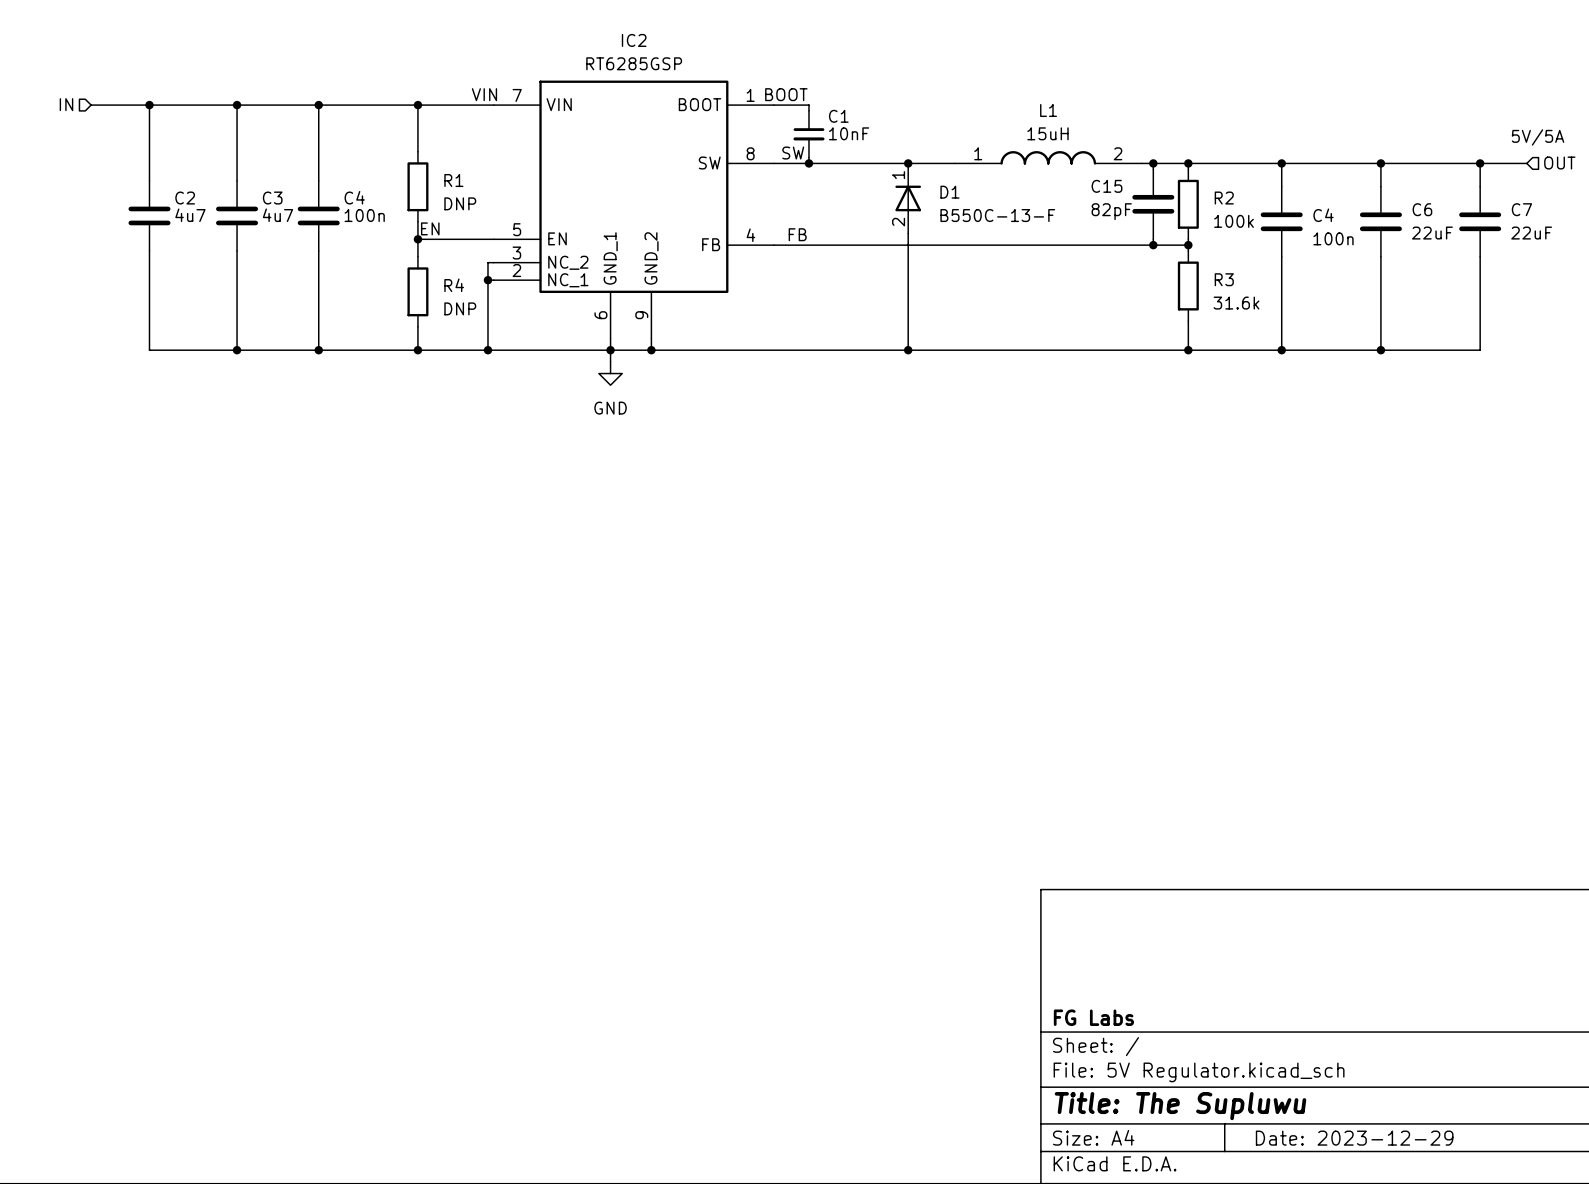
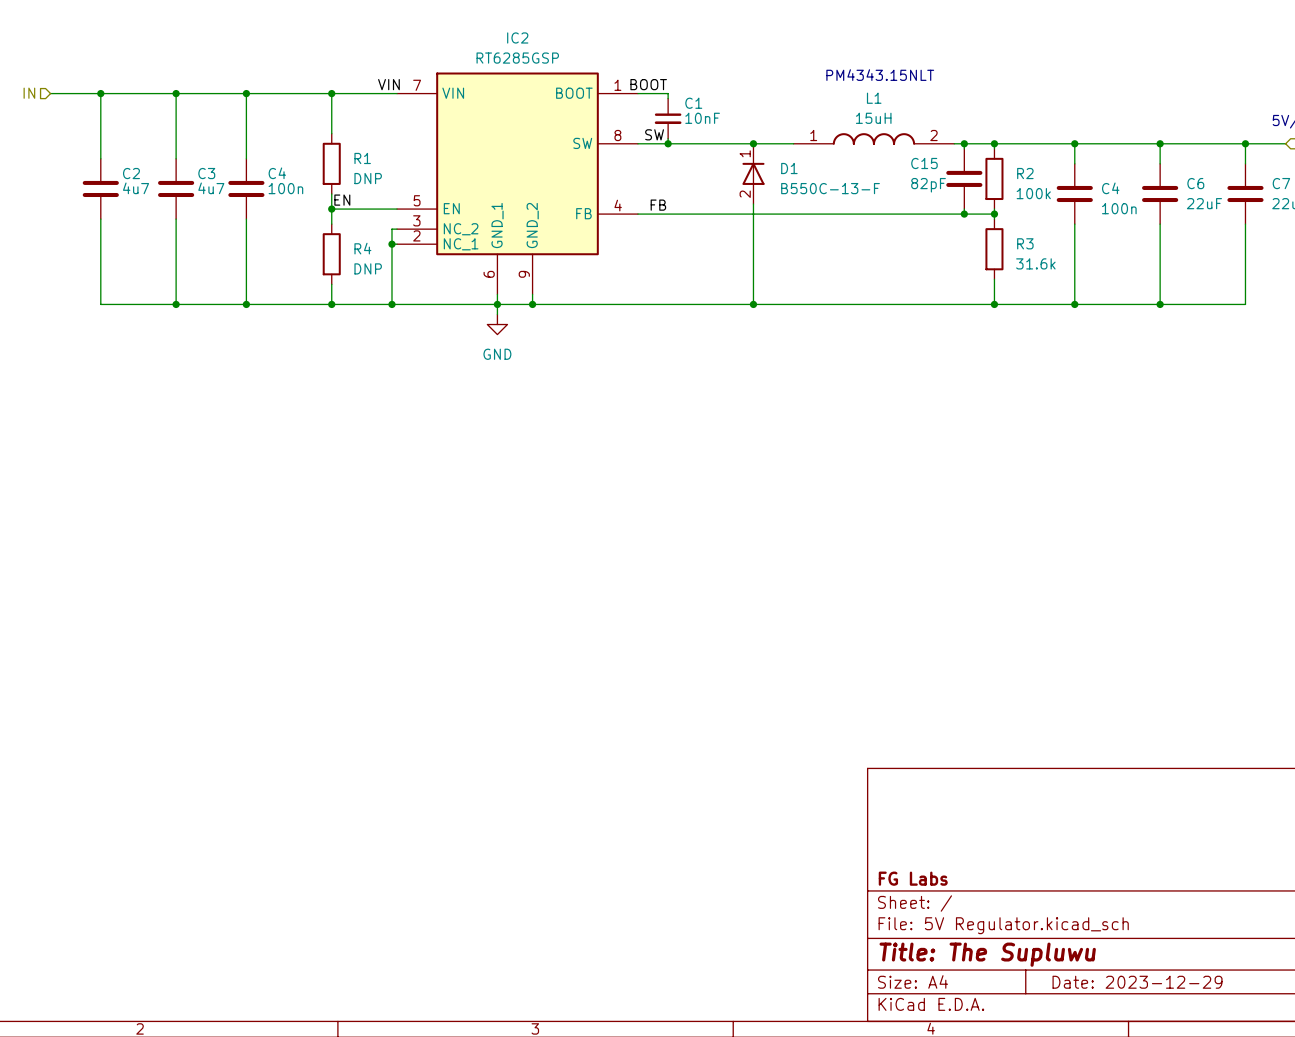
text: none -> PM4343.15NLT (880, 75)

